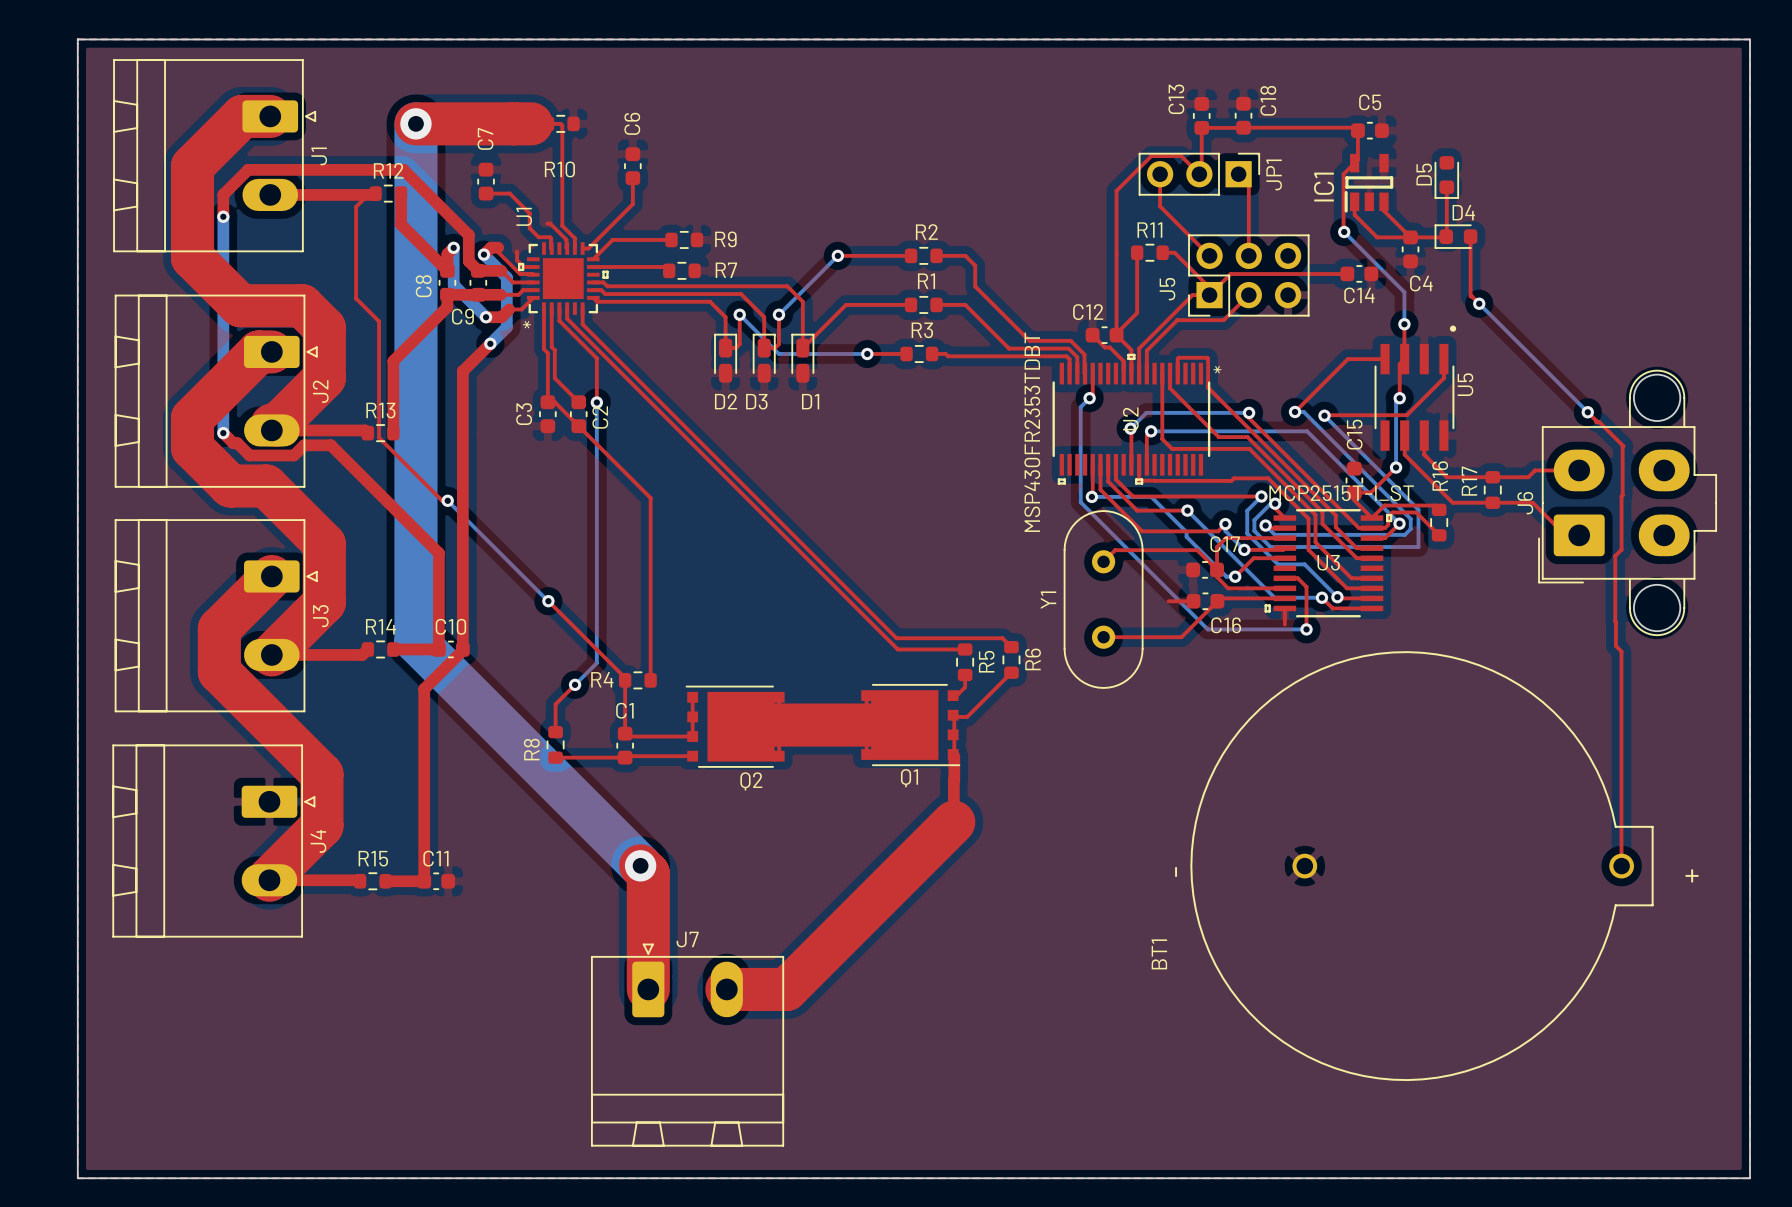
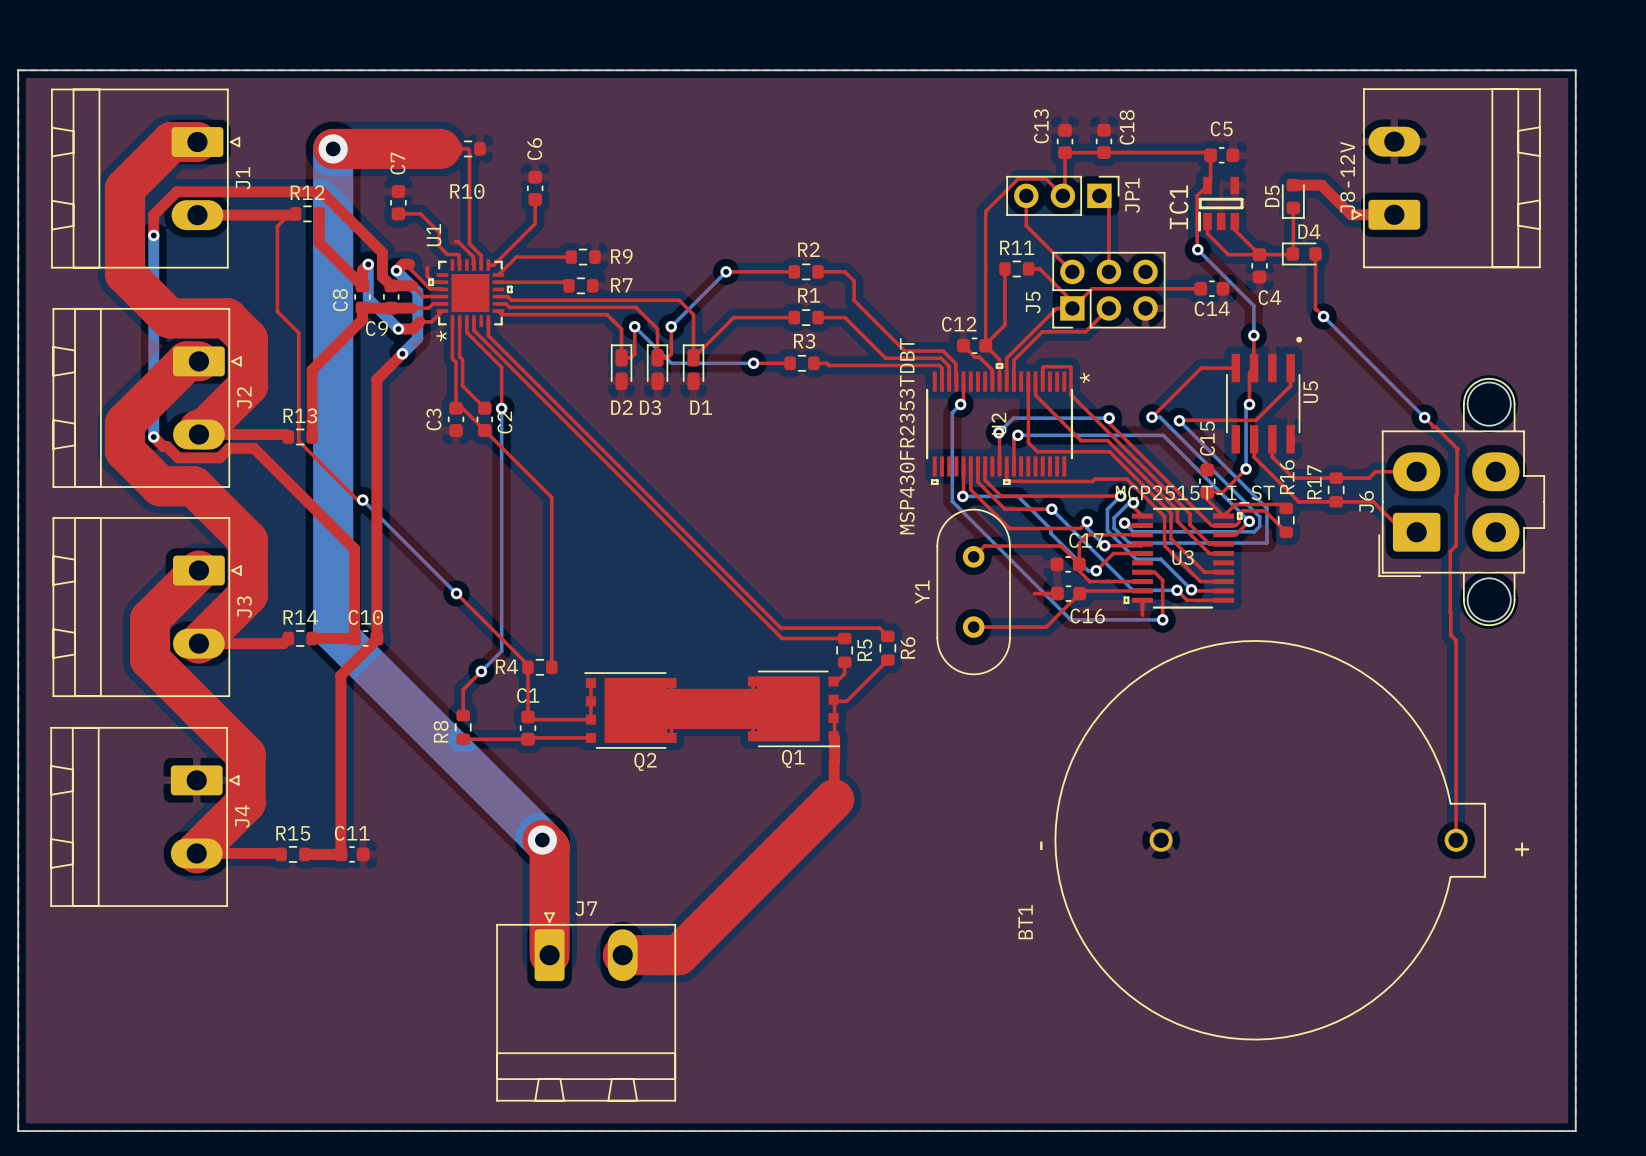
J8-12V: none -> (1446, 178)
top track: none -> (1293, 185) (1321, 185) (1351, 214) (1394, 214)

